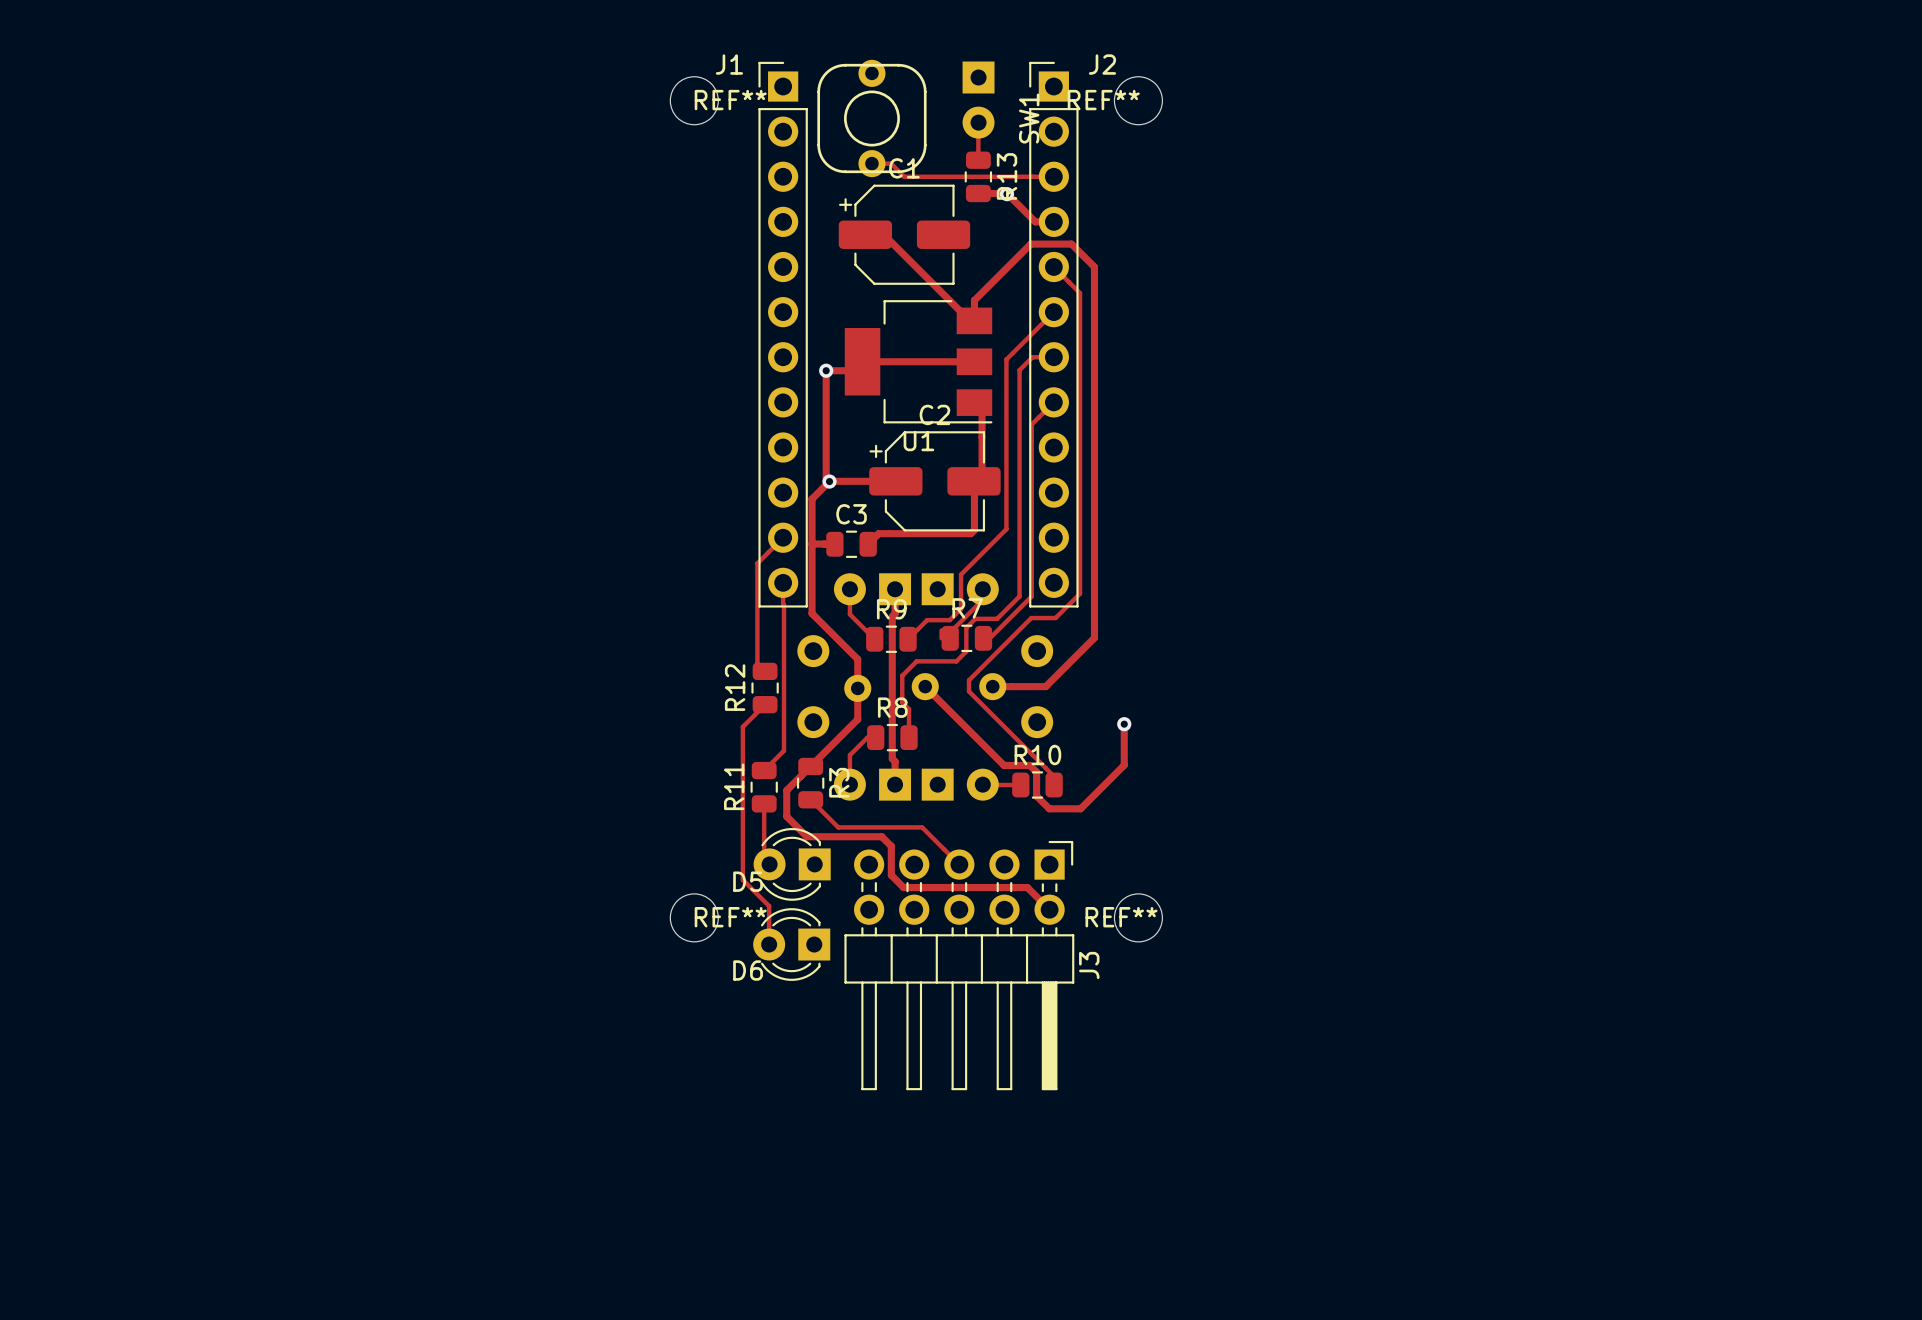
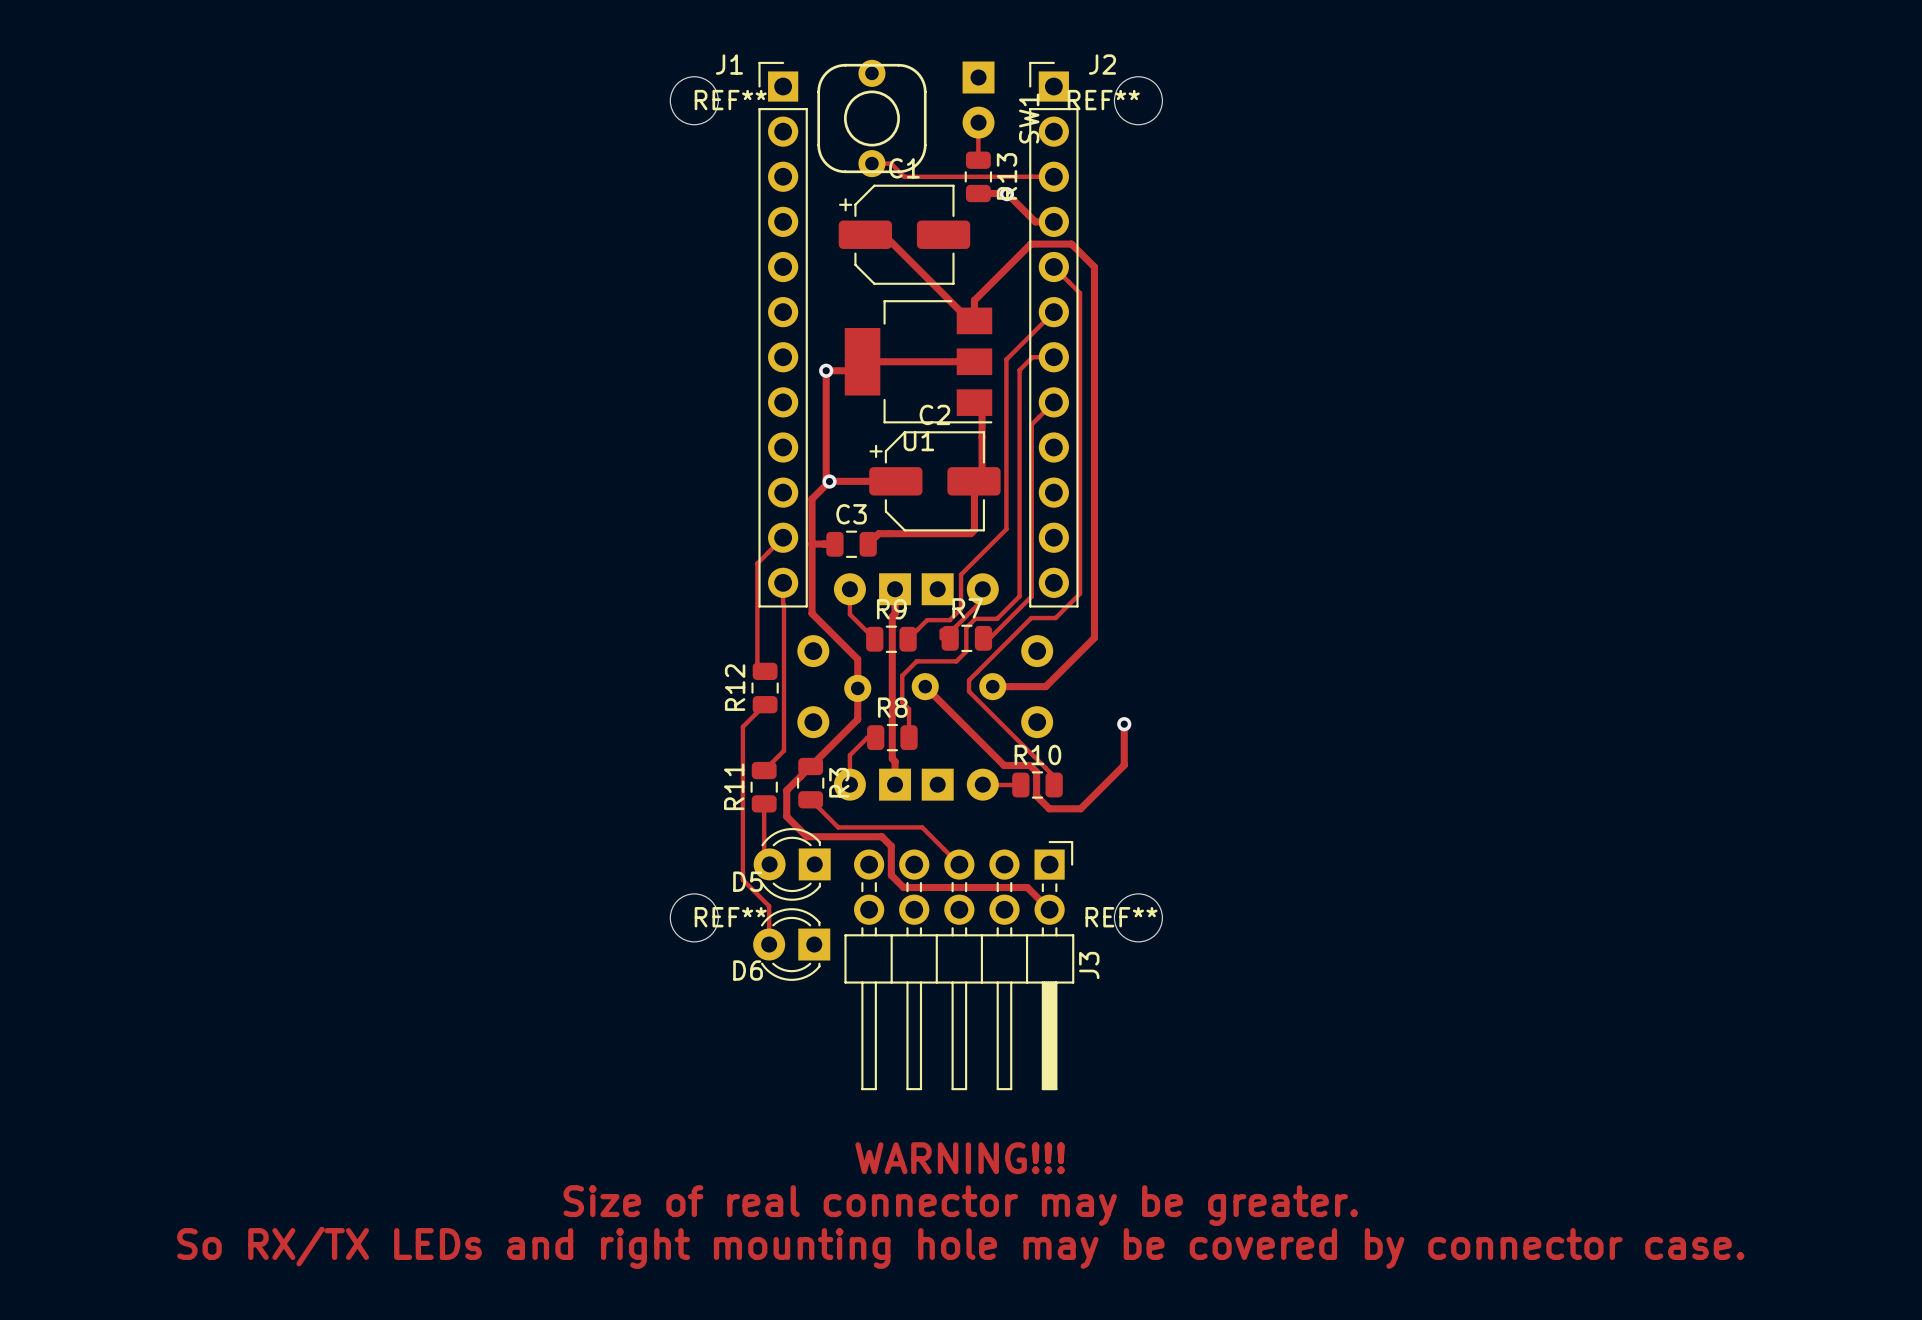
text: none -> WARNING!!! (960, 1158)
text: none -> Size of real connector may be greater. (960, 1205)
text: none -> So RX/TX LEDs and right mounting hole may be covered by connector case. (960, 1247)

